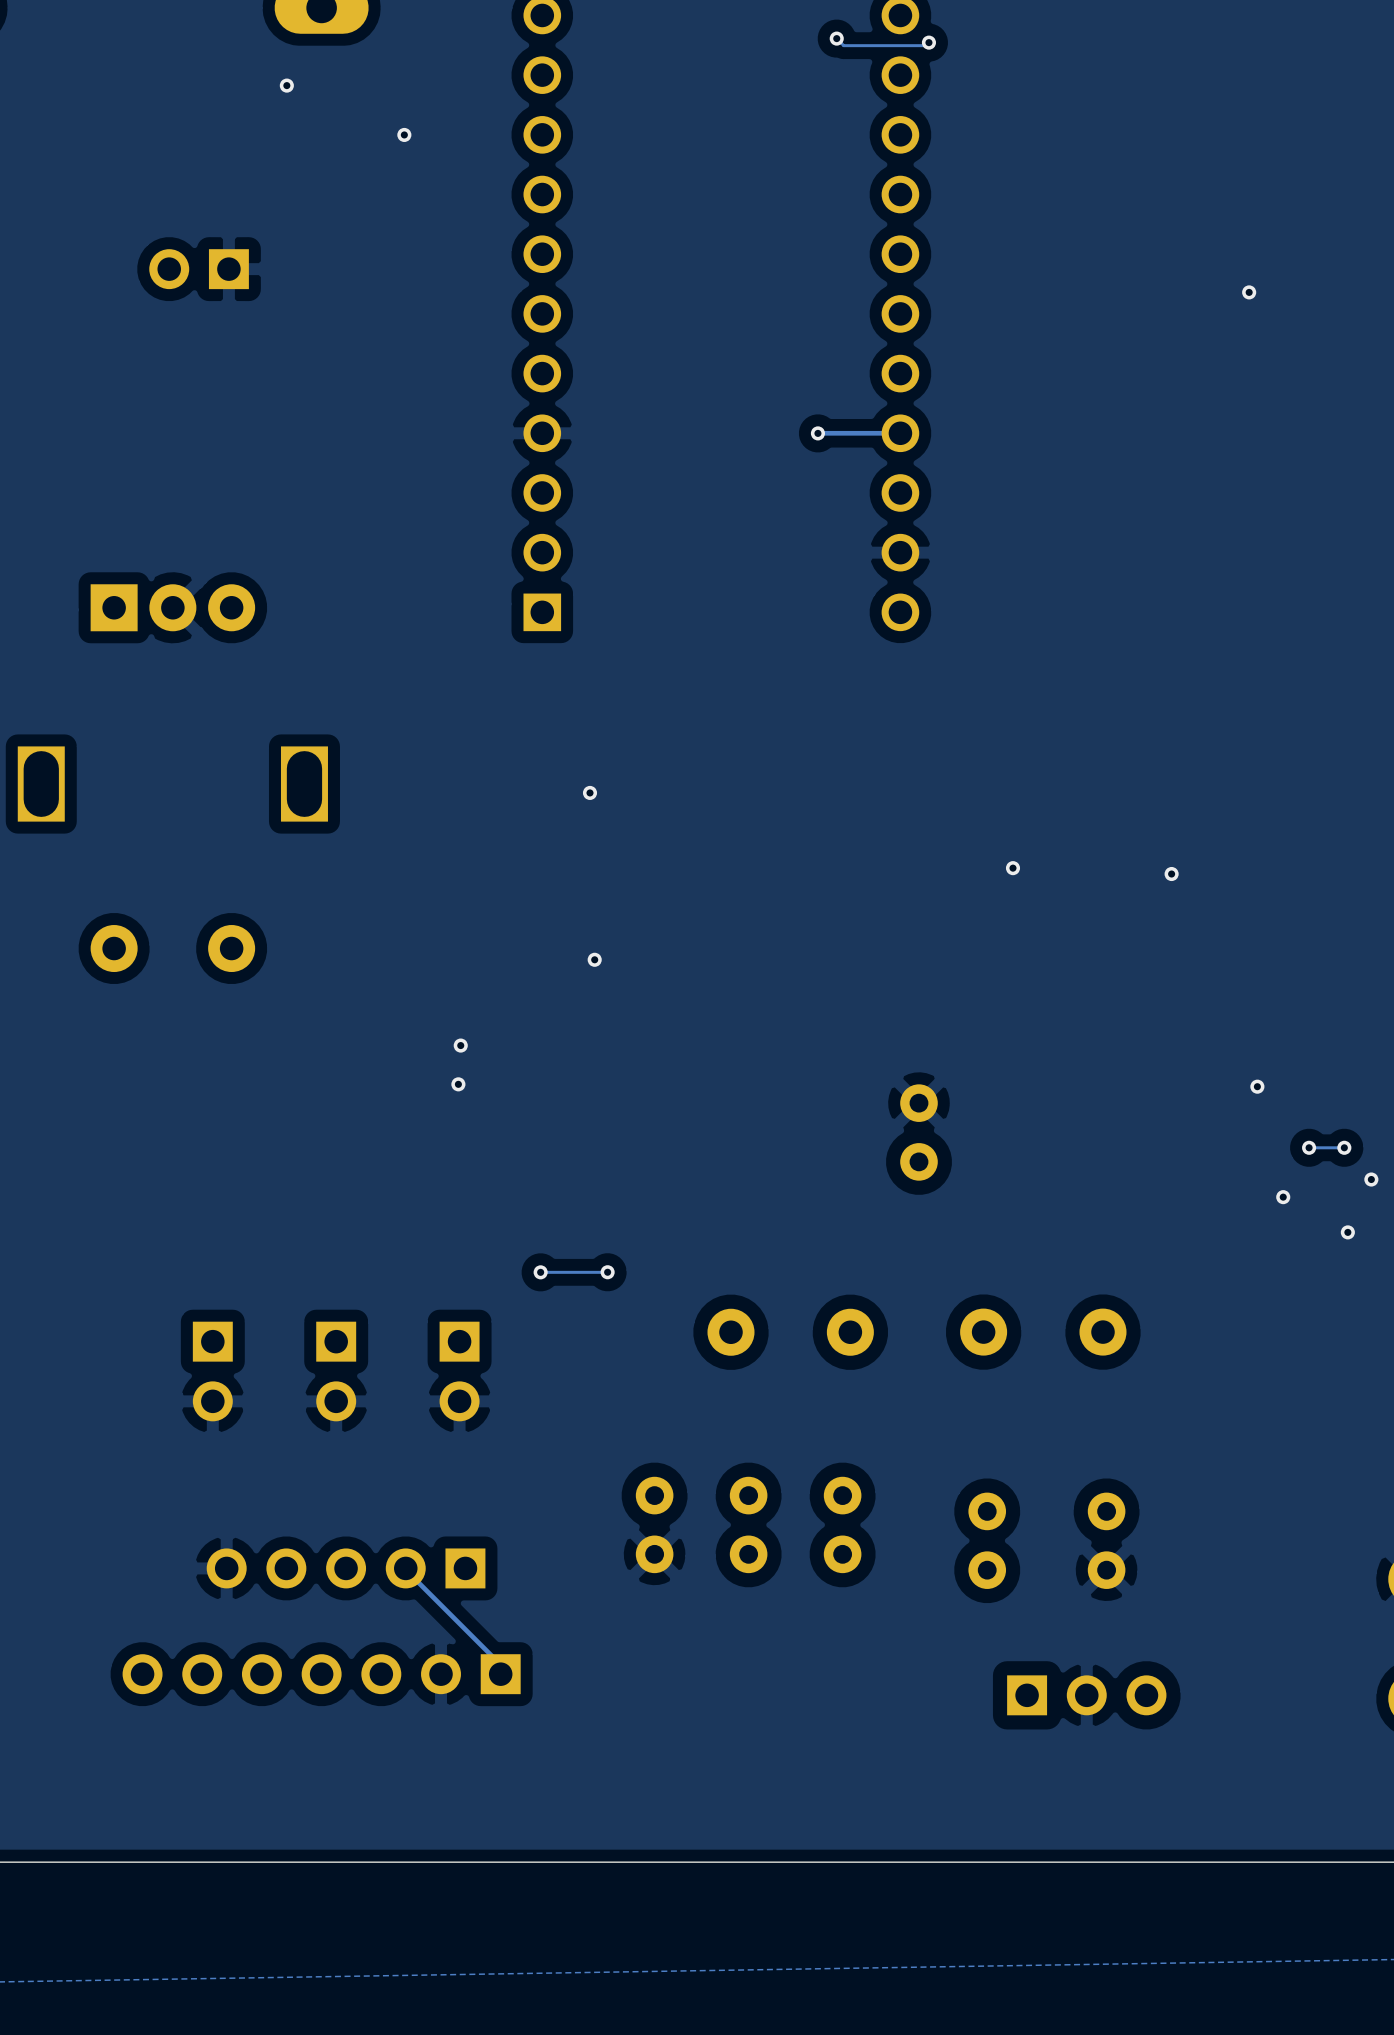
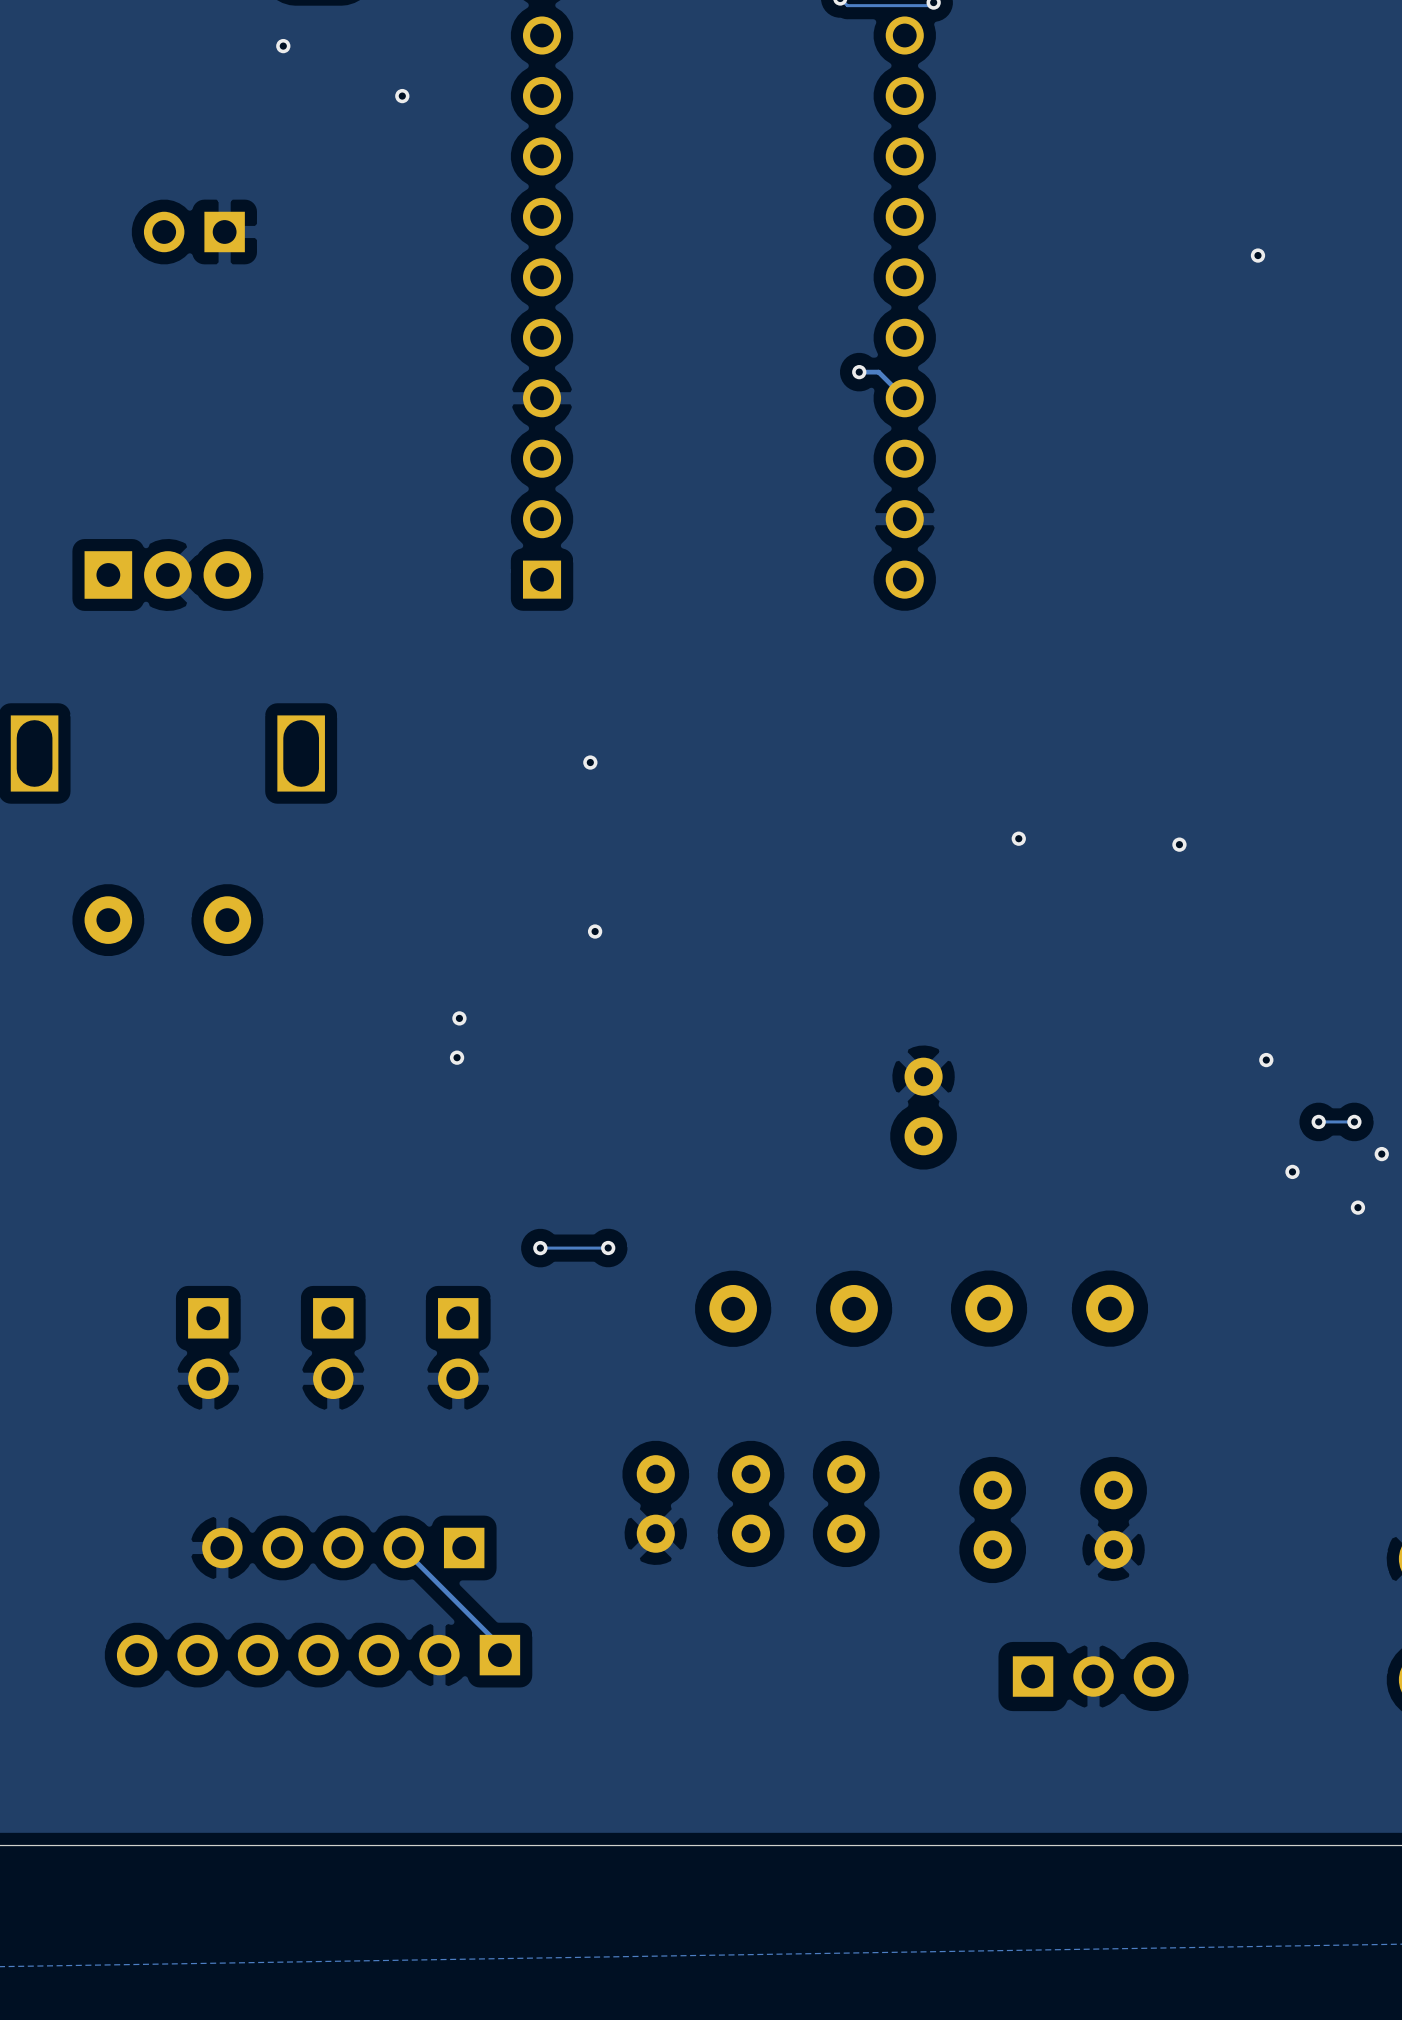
via position: (817, 433) -> (859, 372)
track: (900, 433) (818, 433) -> (904, 398) (878, 372) (859, 372)

